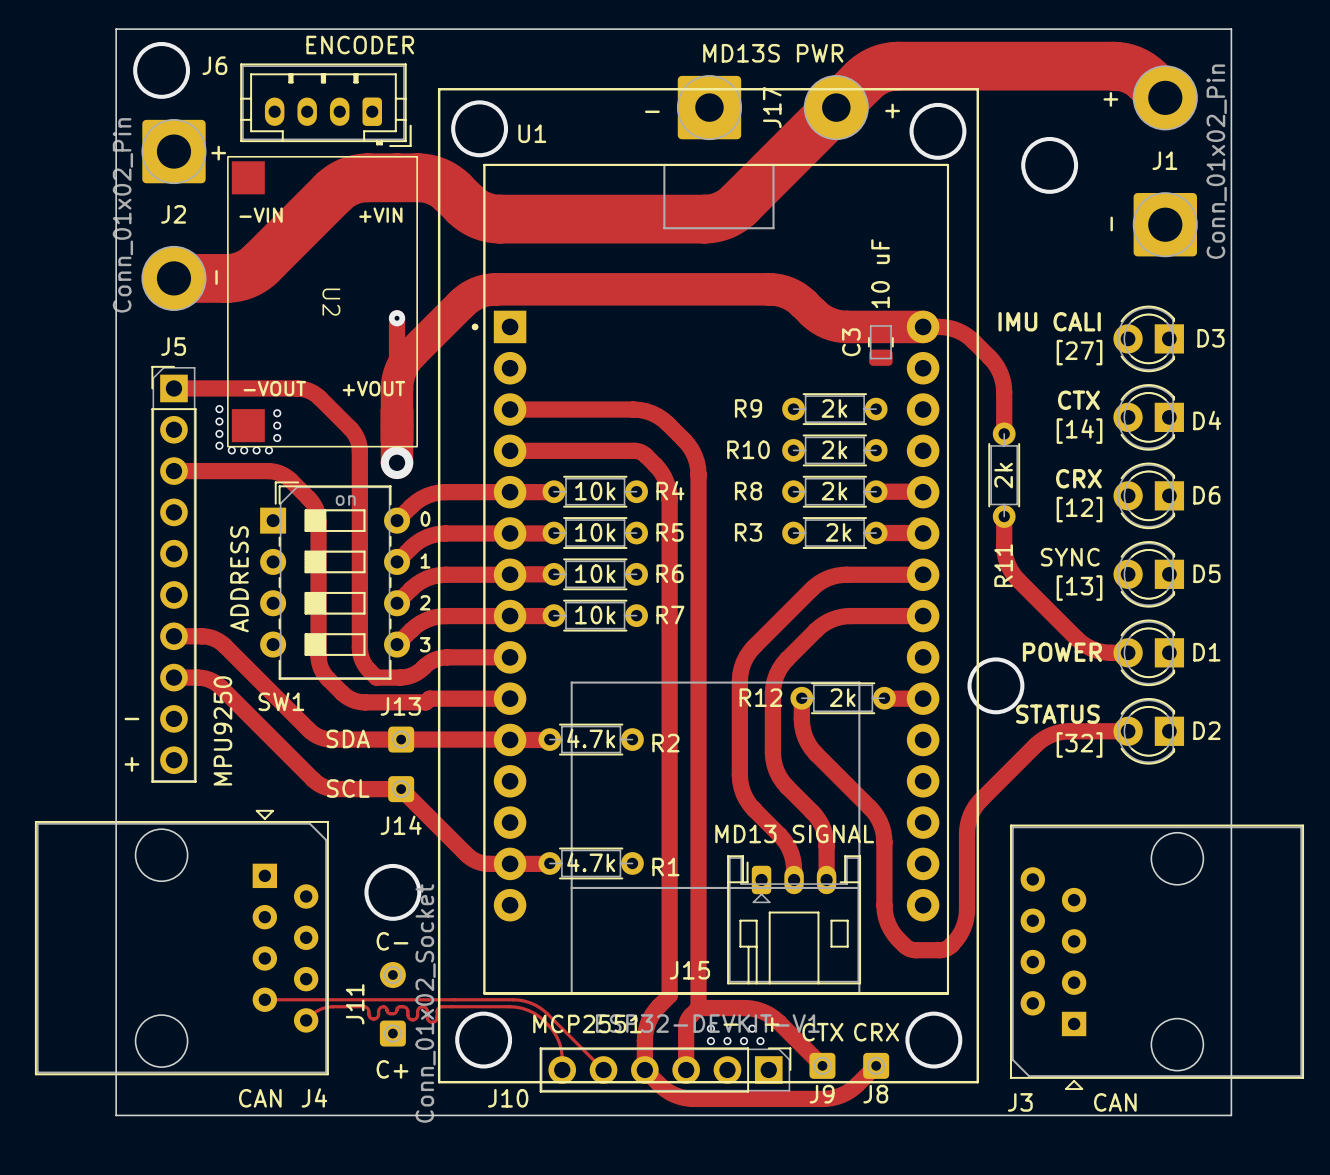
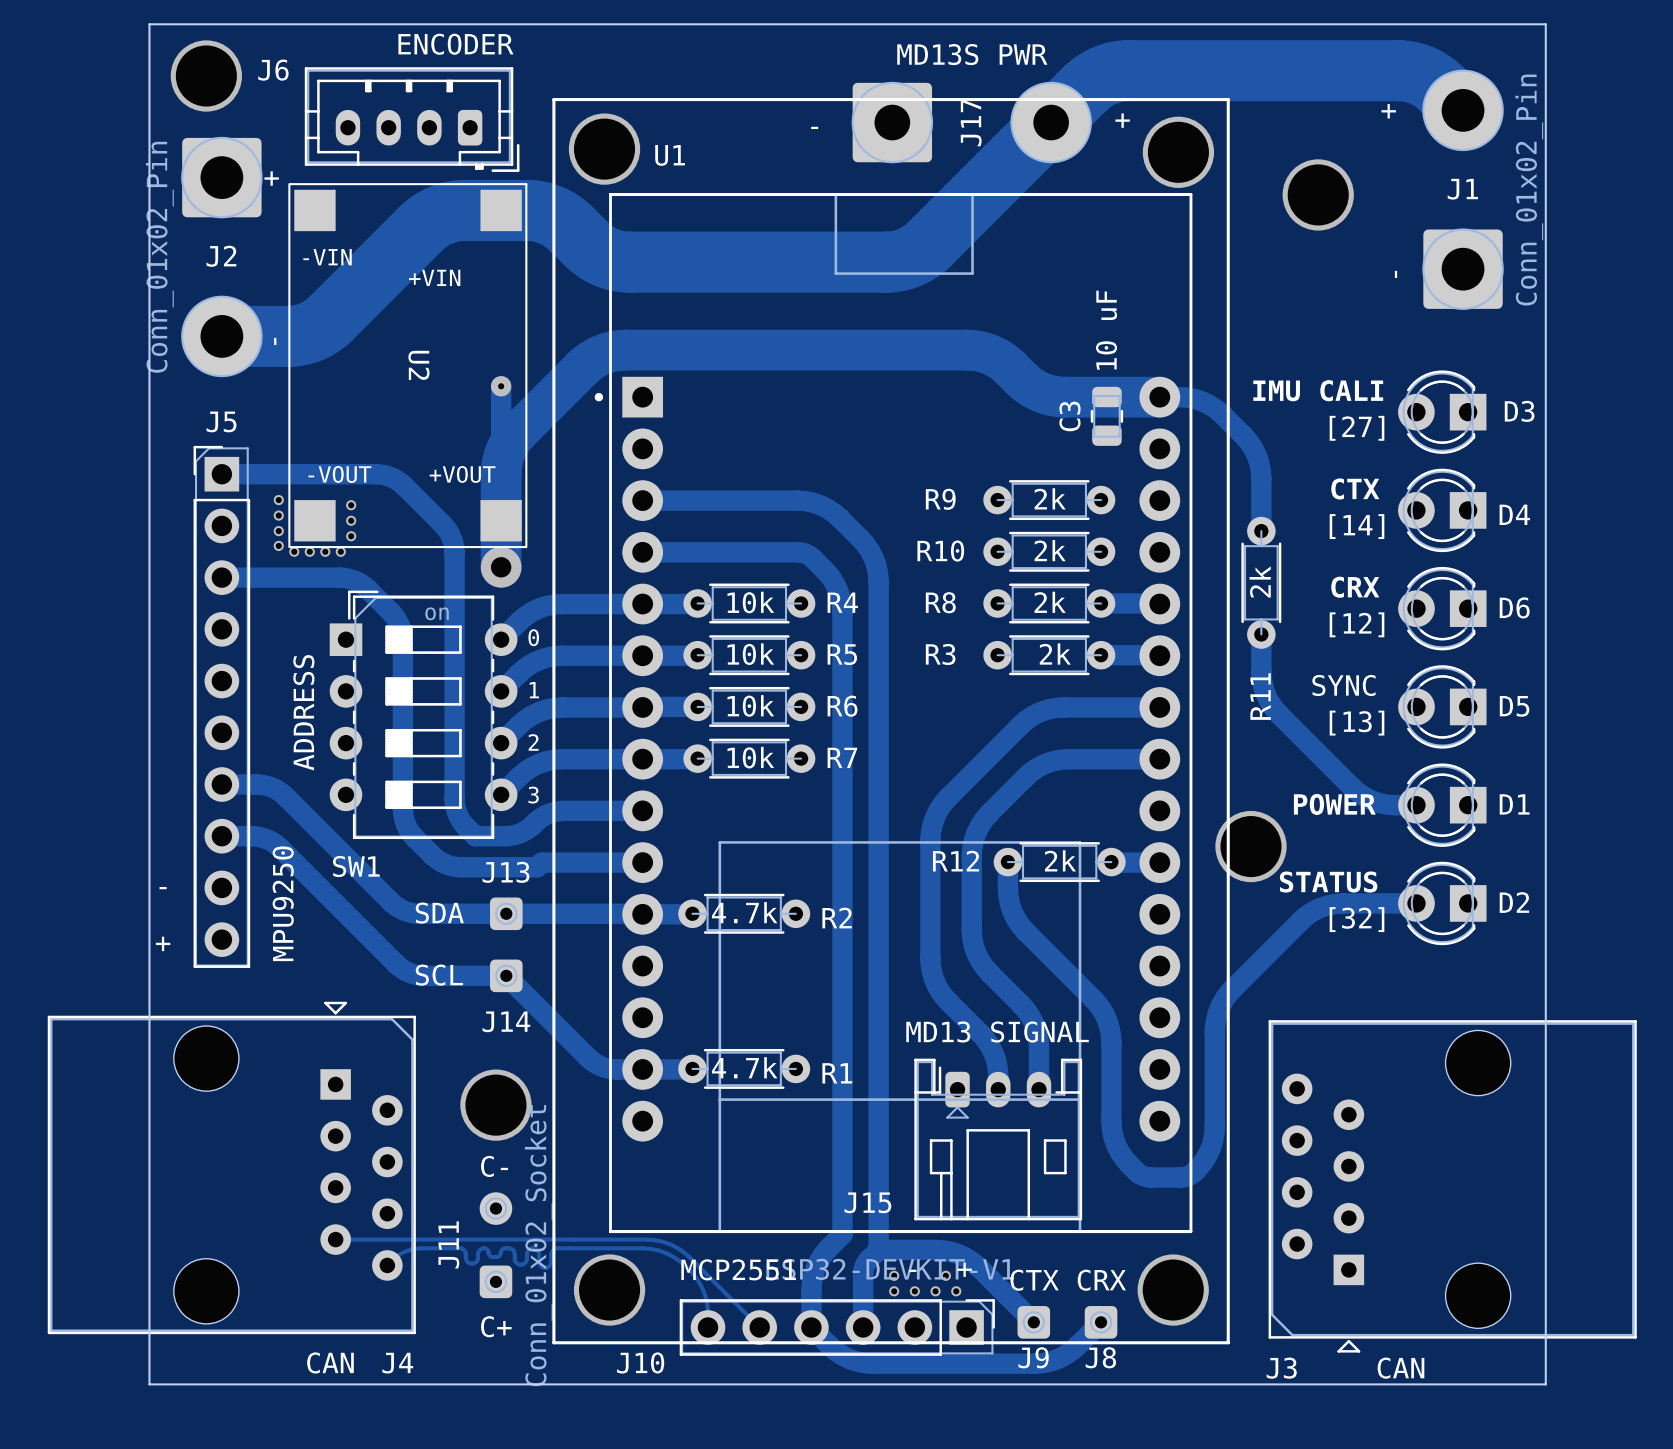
text position: +VIN (380, 215) -> +VIN (434, 277)

